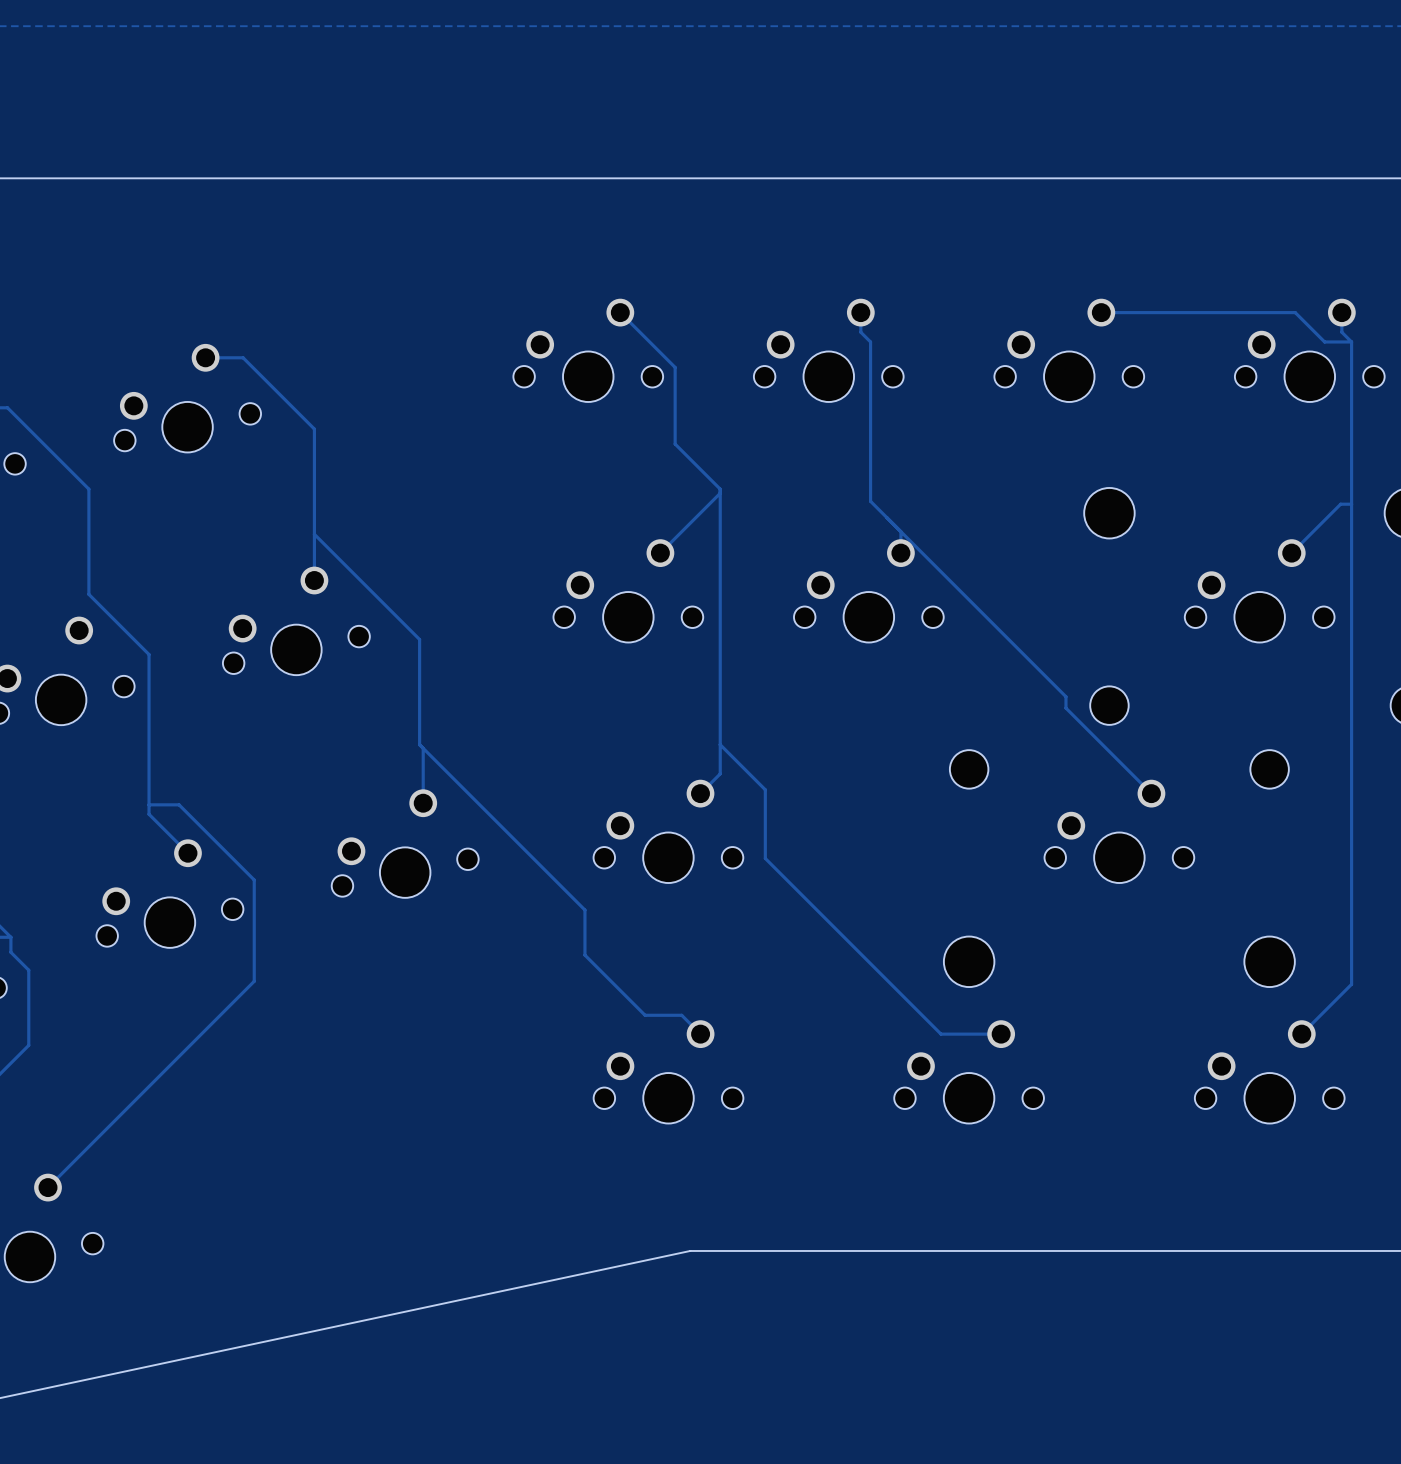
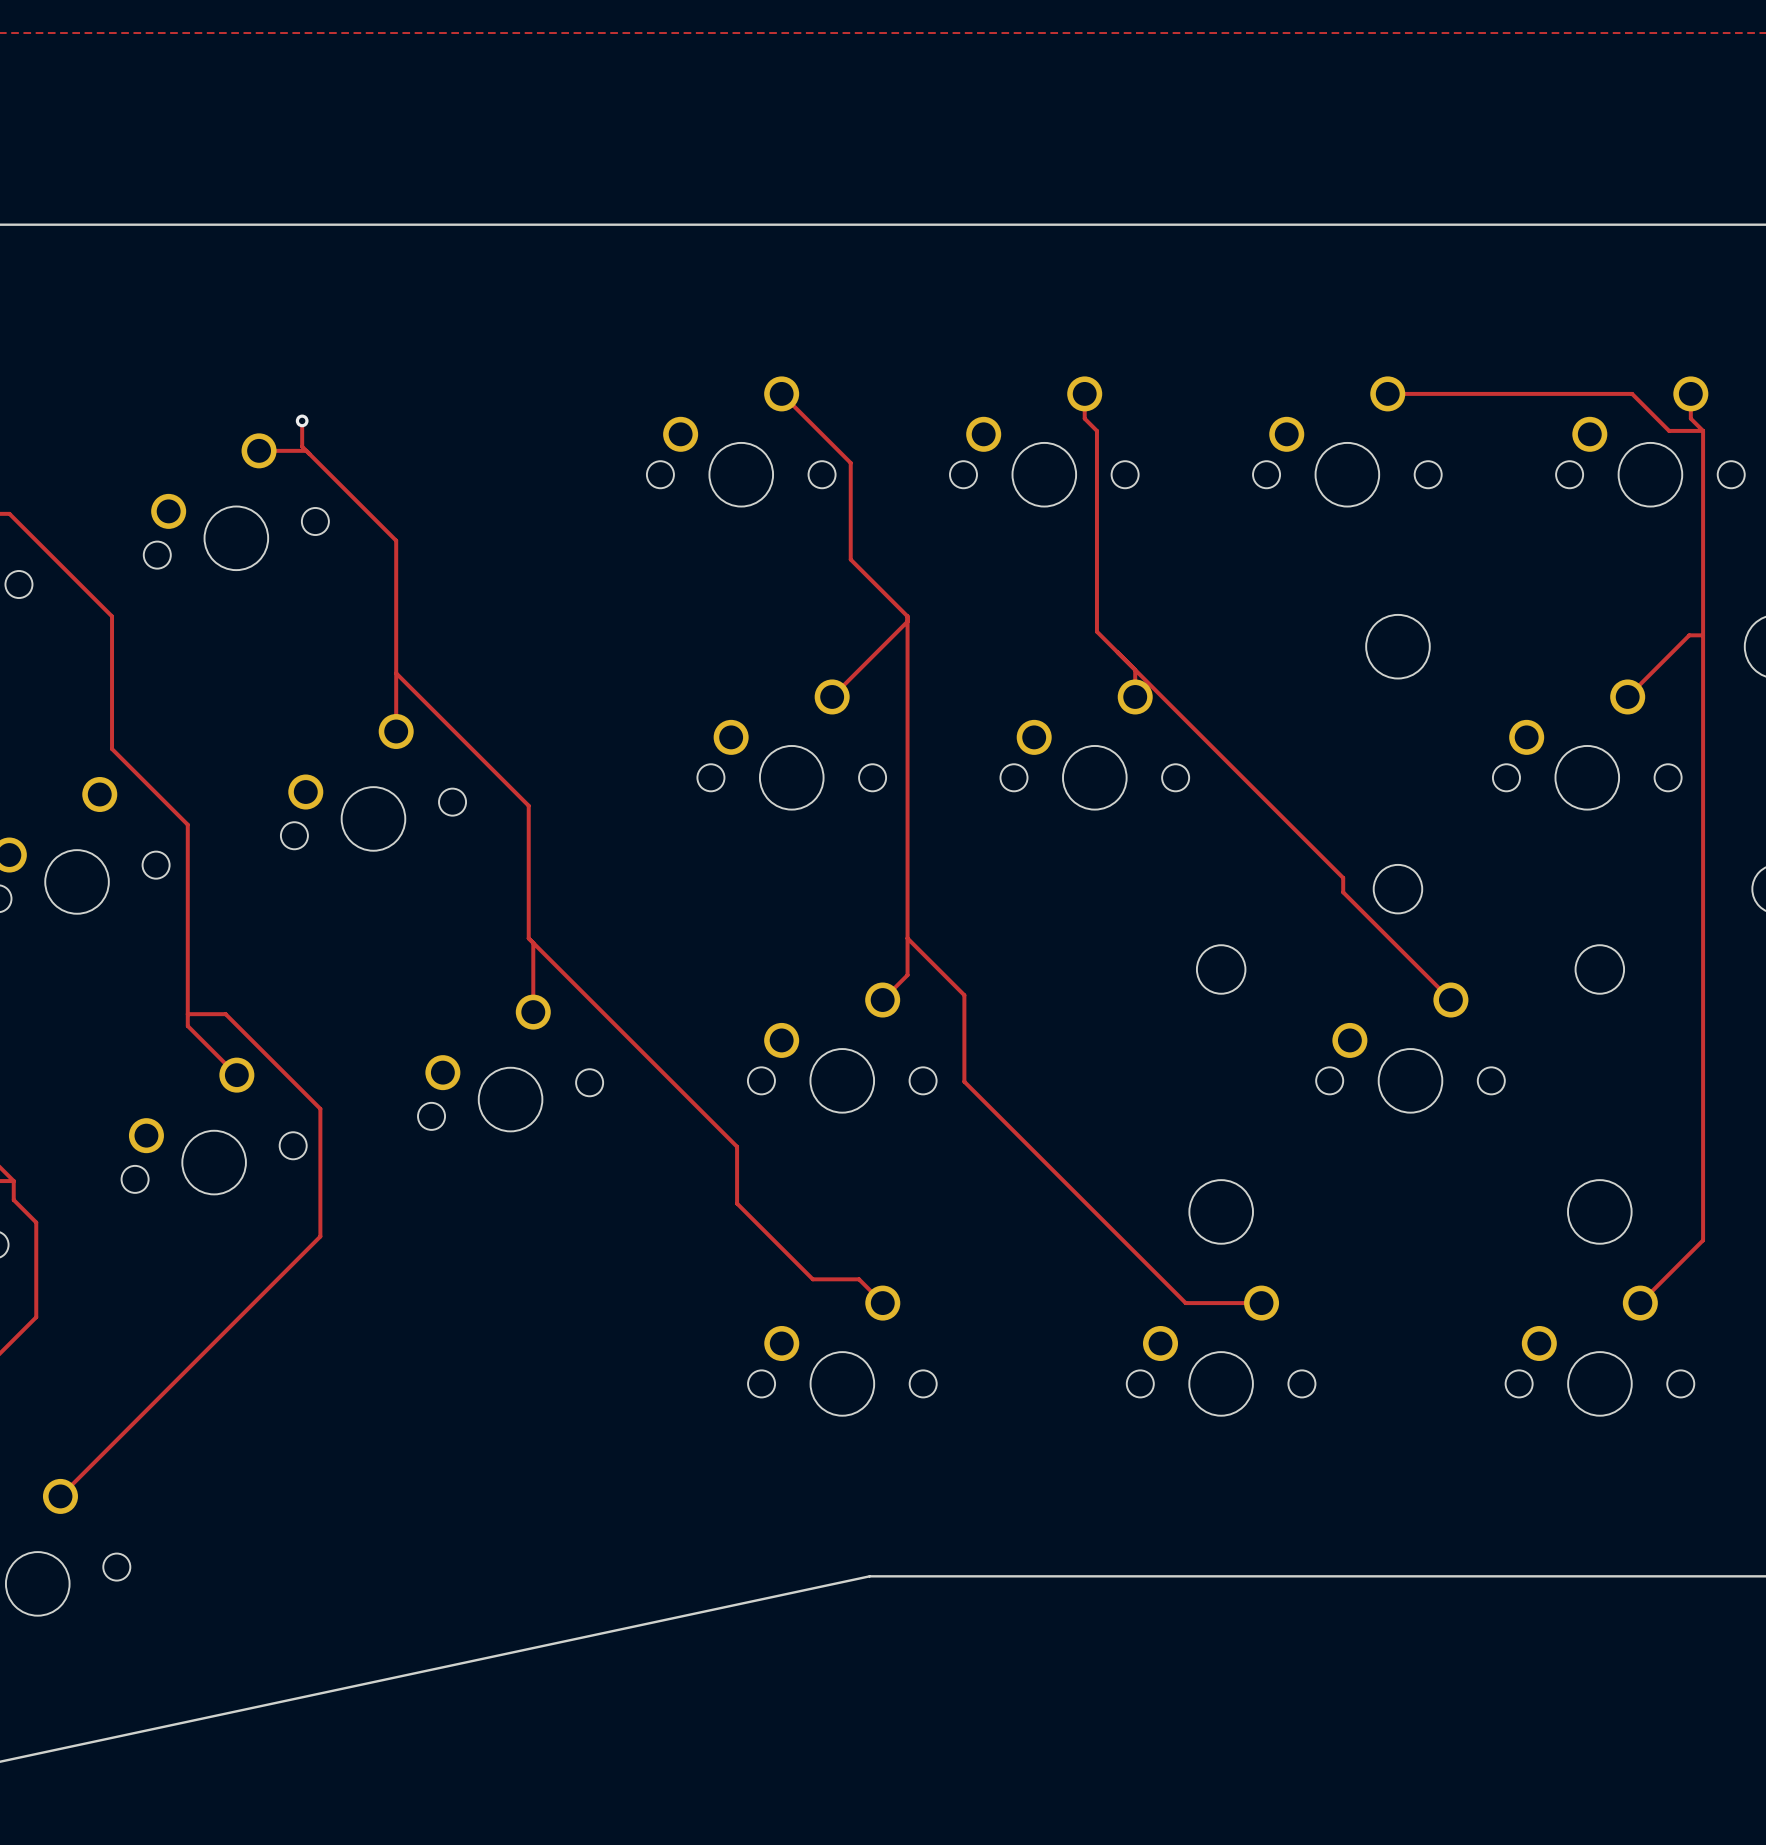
track: none -> (302, 420) (302, 446) (306, 450)
via: none -> (302, 420)

